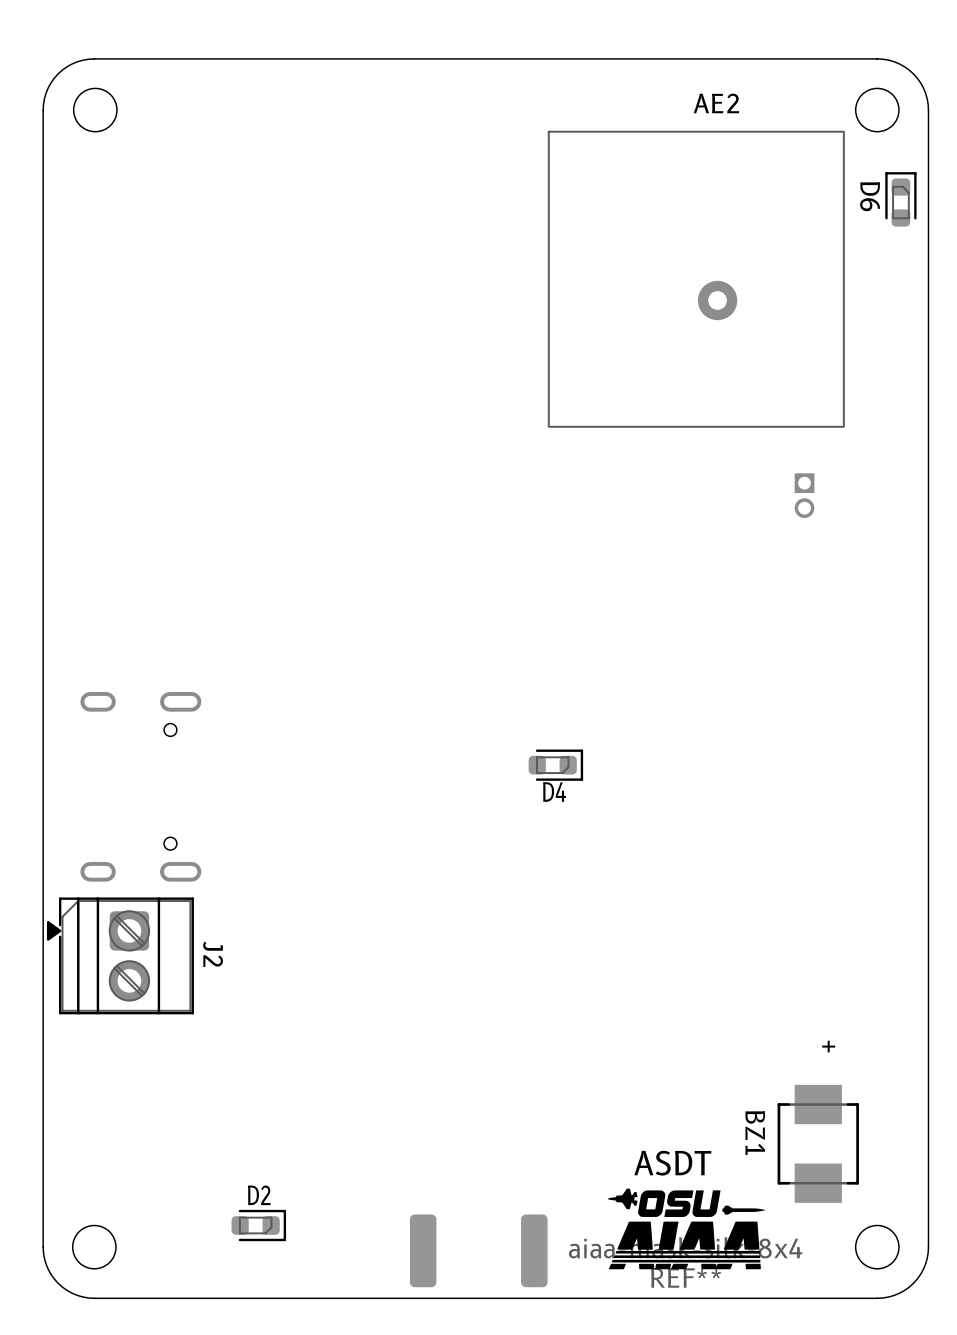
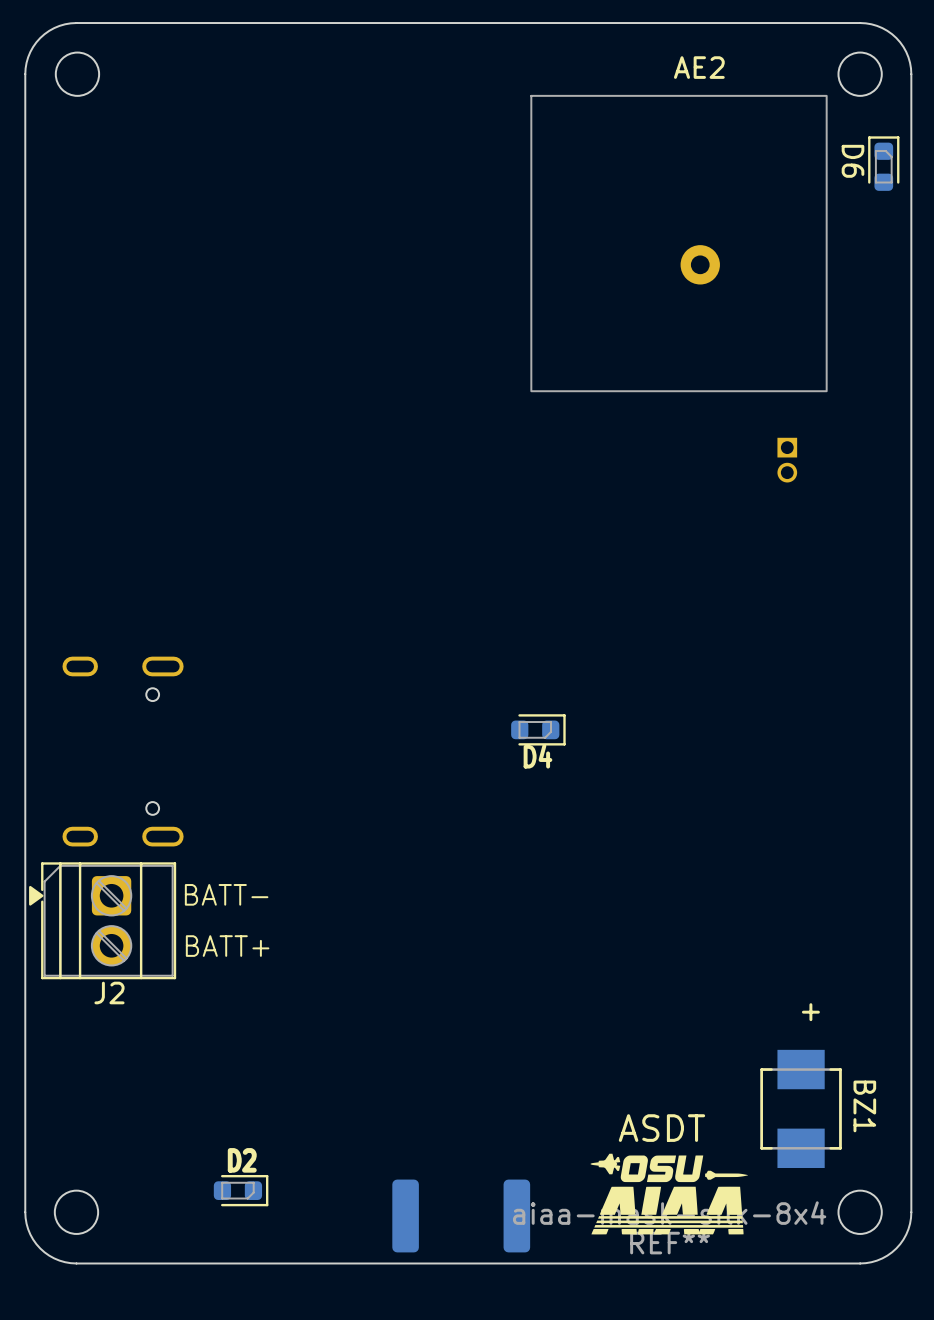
text: none -> BATT- (226, 894)
J2 name rotation: 0° (213, 954) -> 90° counterclockwise (109, 993)
J2 name position: J2 (213, 954) -> J2 (109, 993)
text: none -> BATT+ (227, 946)
BZ1 name position: BZ1 (755, 1132) -> BZ1 (864, 1106)

